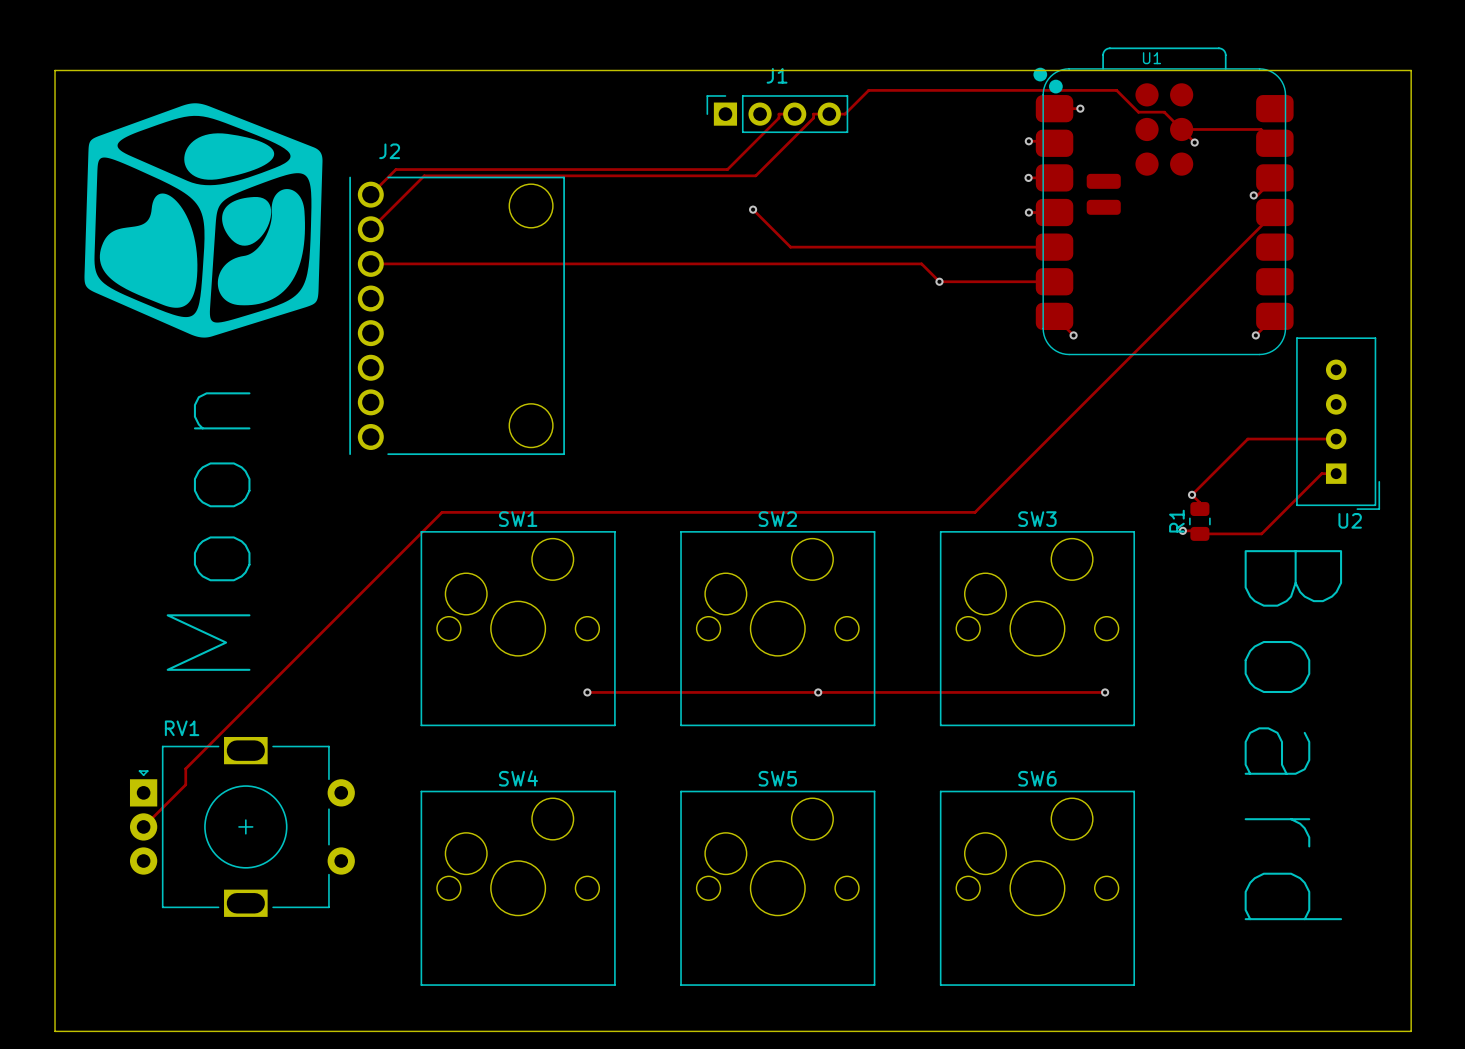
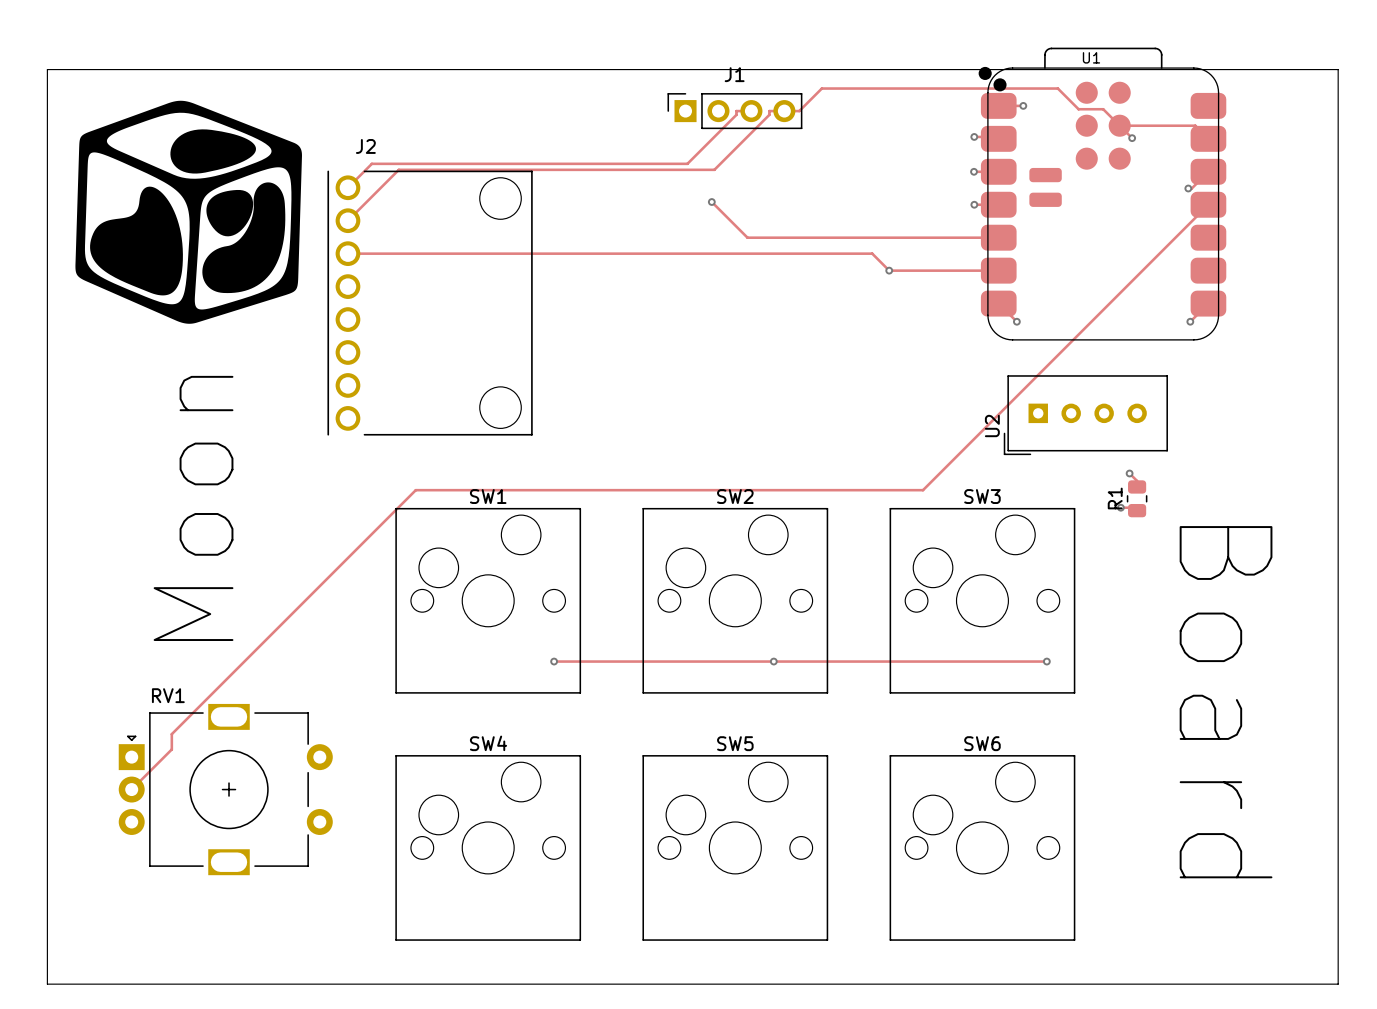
U2 rotation: 0° (1338, 423) -> 90° clockwise (1085, 415)
U2 position: (1338, 423) -> (1085, 415)
track: (1336, 439) (1247, 439) (1192, 494) (1199, 502) -> (1129, 473) (1137, 480)
track: (1336, 473) (1321, 473) (1261, 533) (1199, 533) -> none

